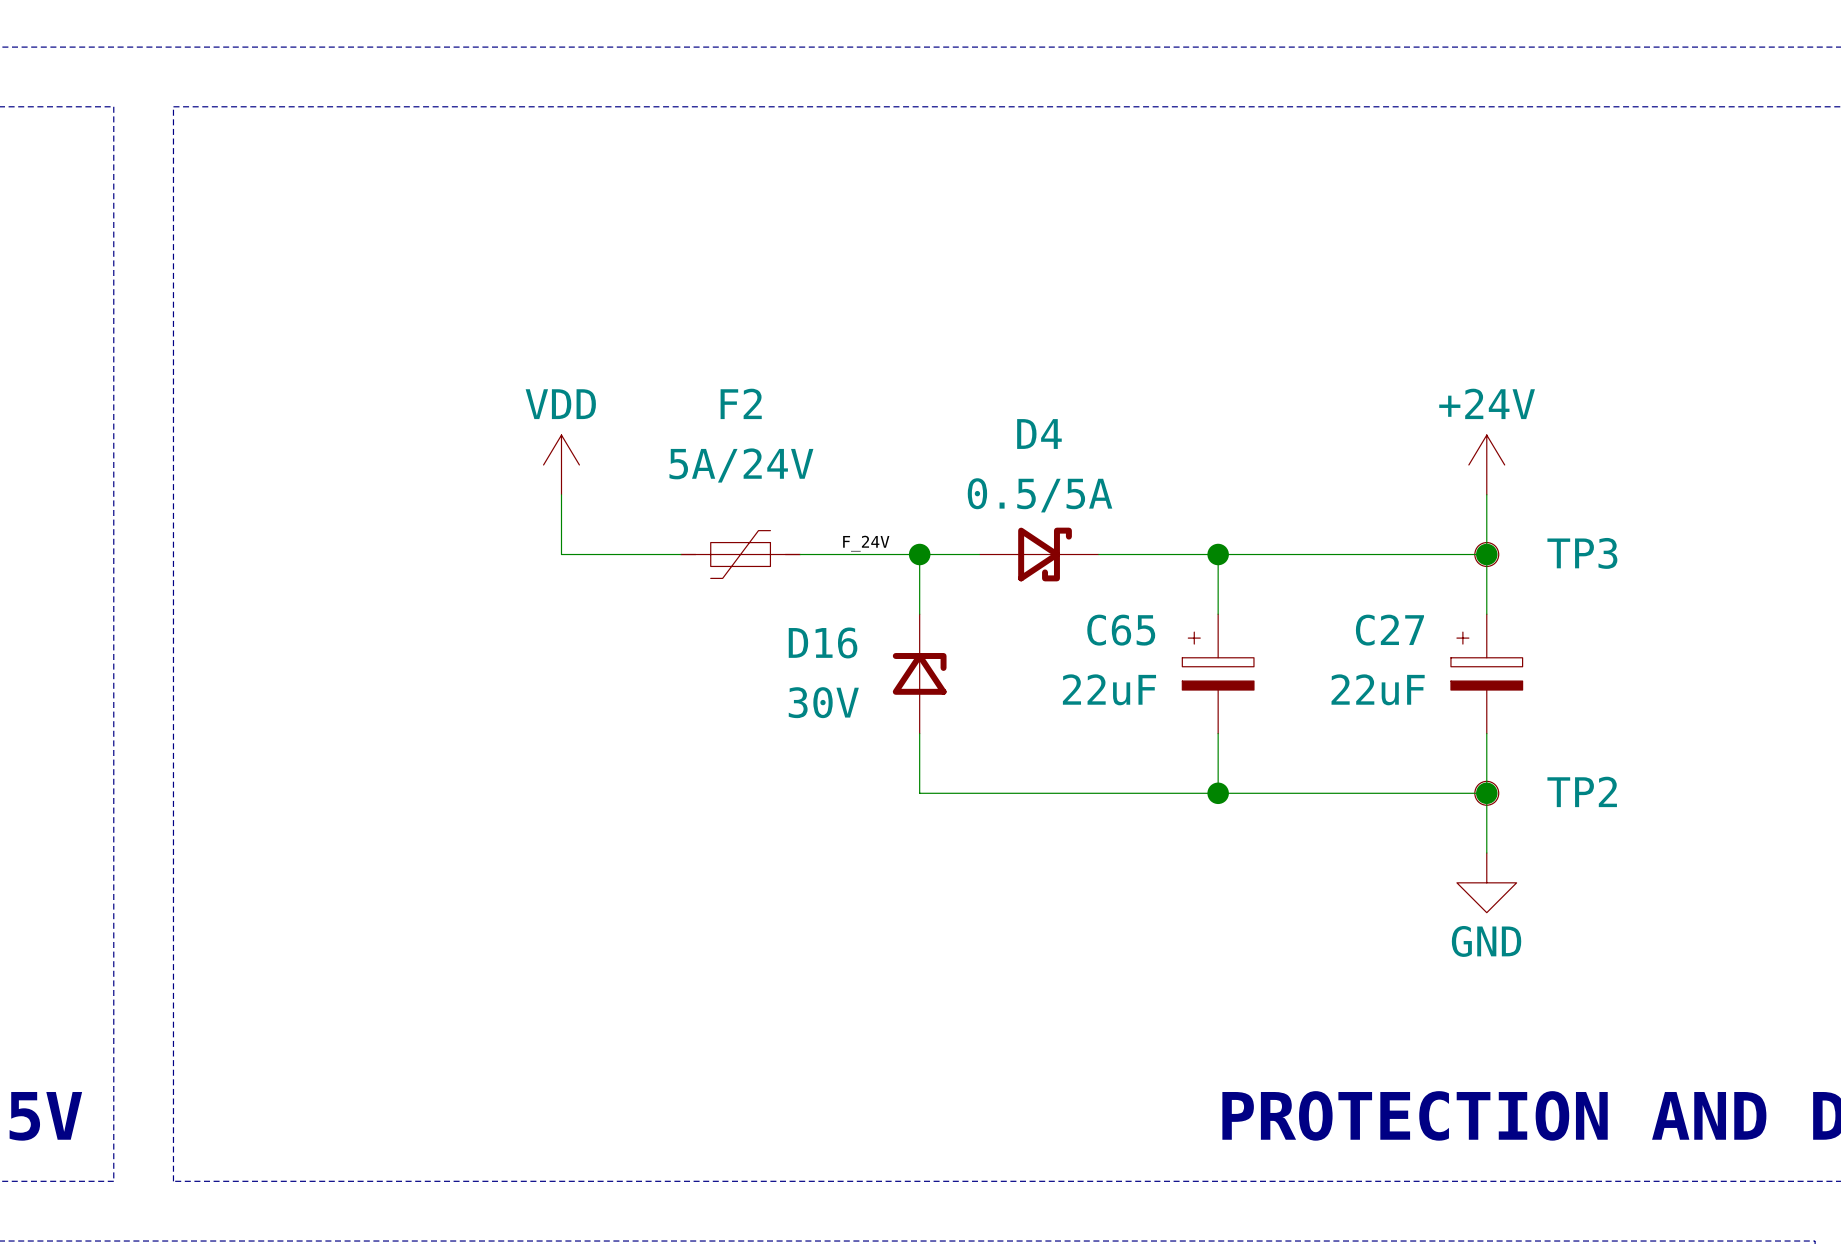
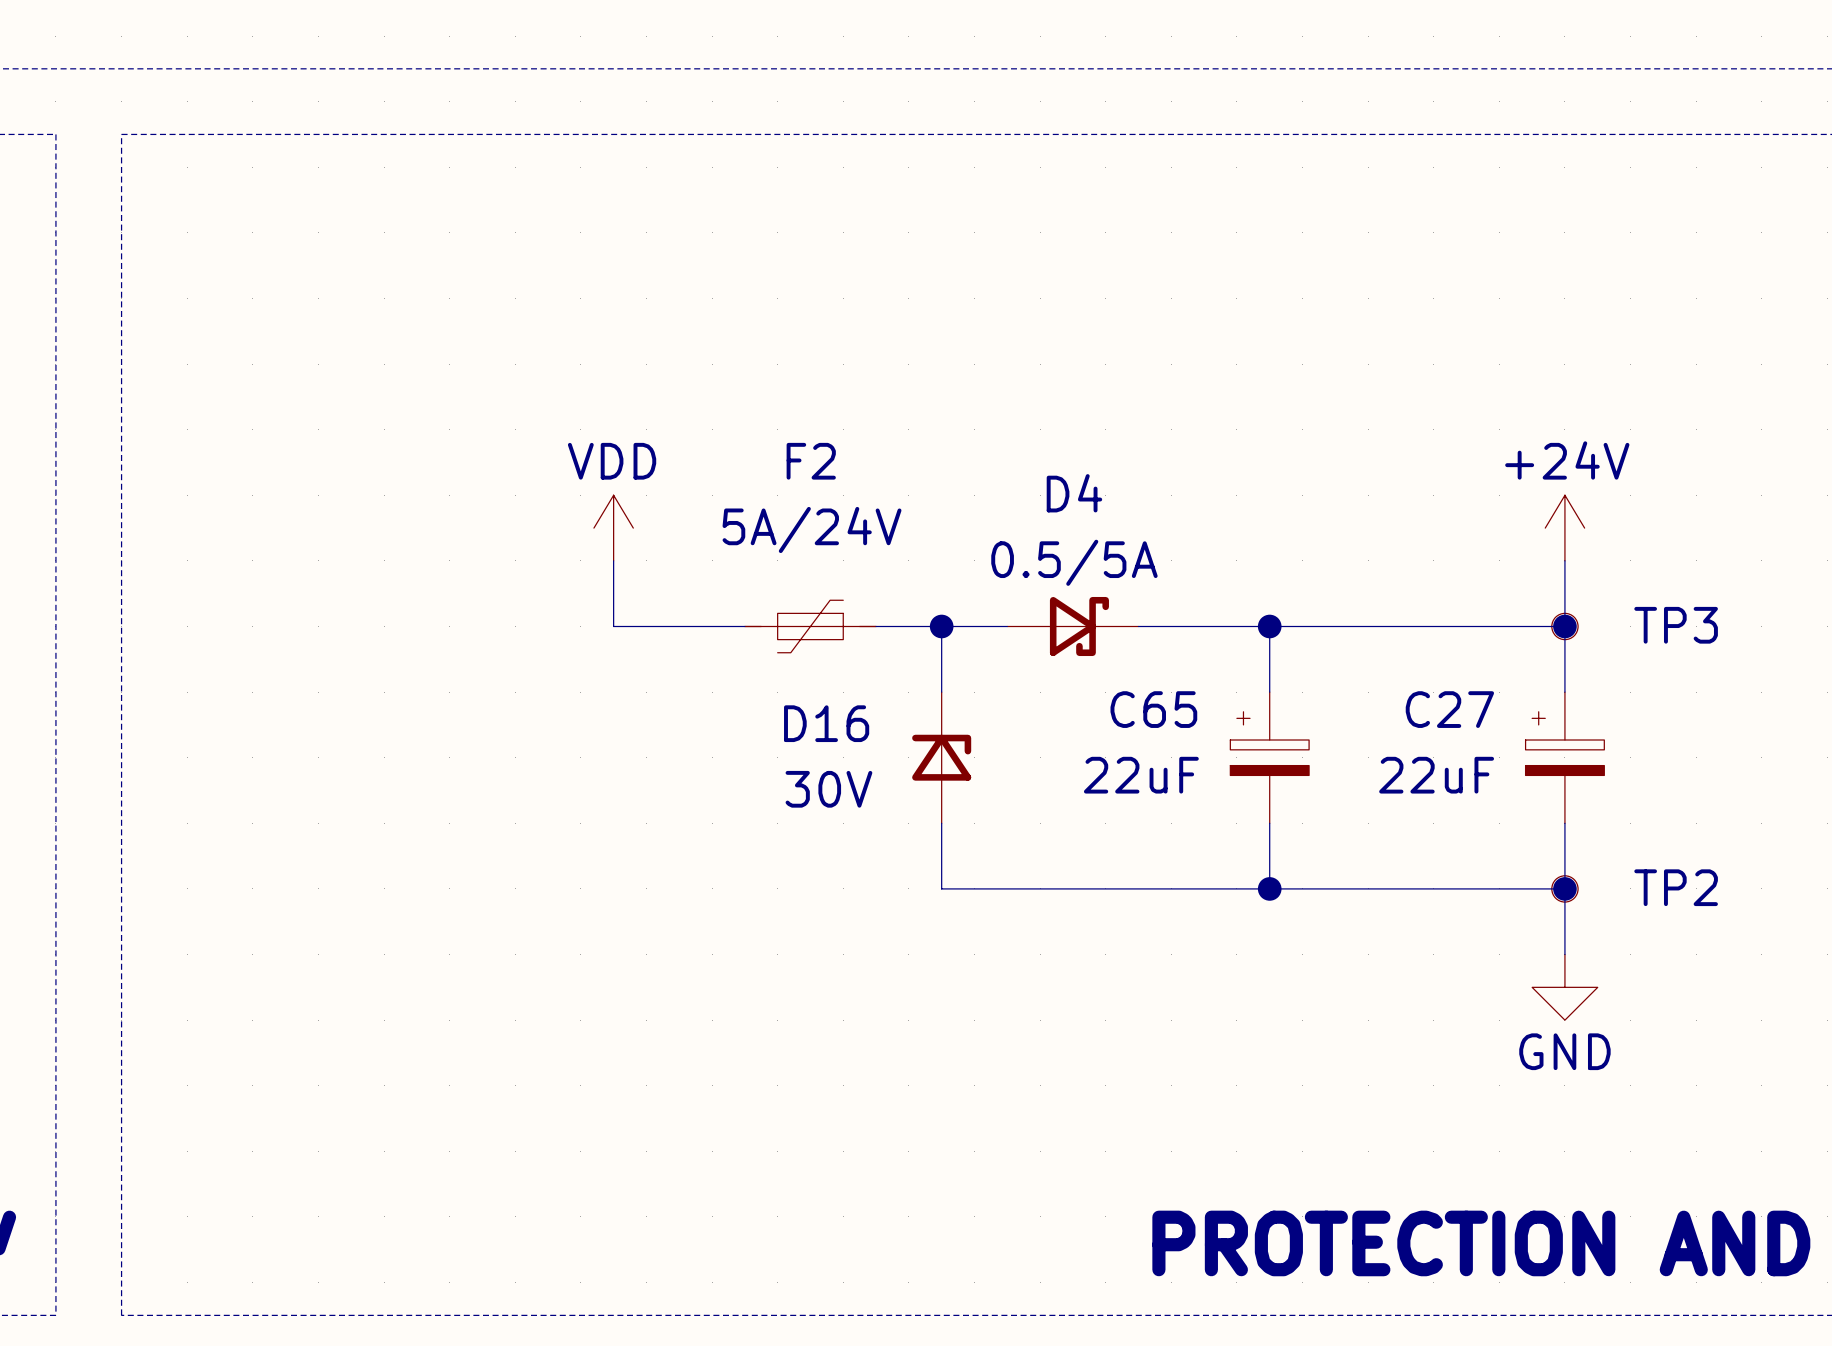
power symbol position: VDD (561, 464) -> VDD (613, 528)
wire: (561, 494) (561, 554) (621, 554) -> (613, 560) (613, 626)
label: F_24V (866, 543) -> none
F2 position: (740, 554) -> (810, 626)

